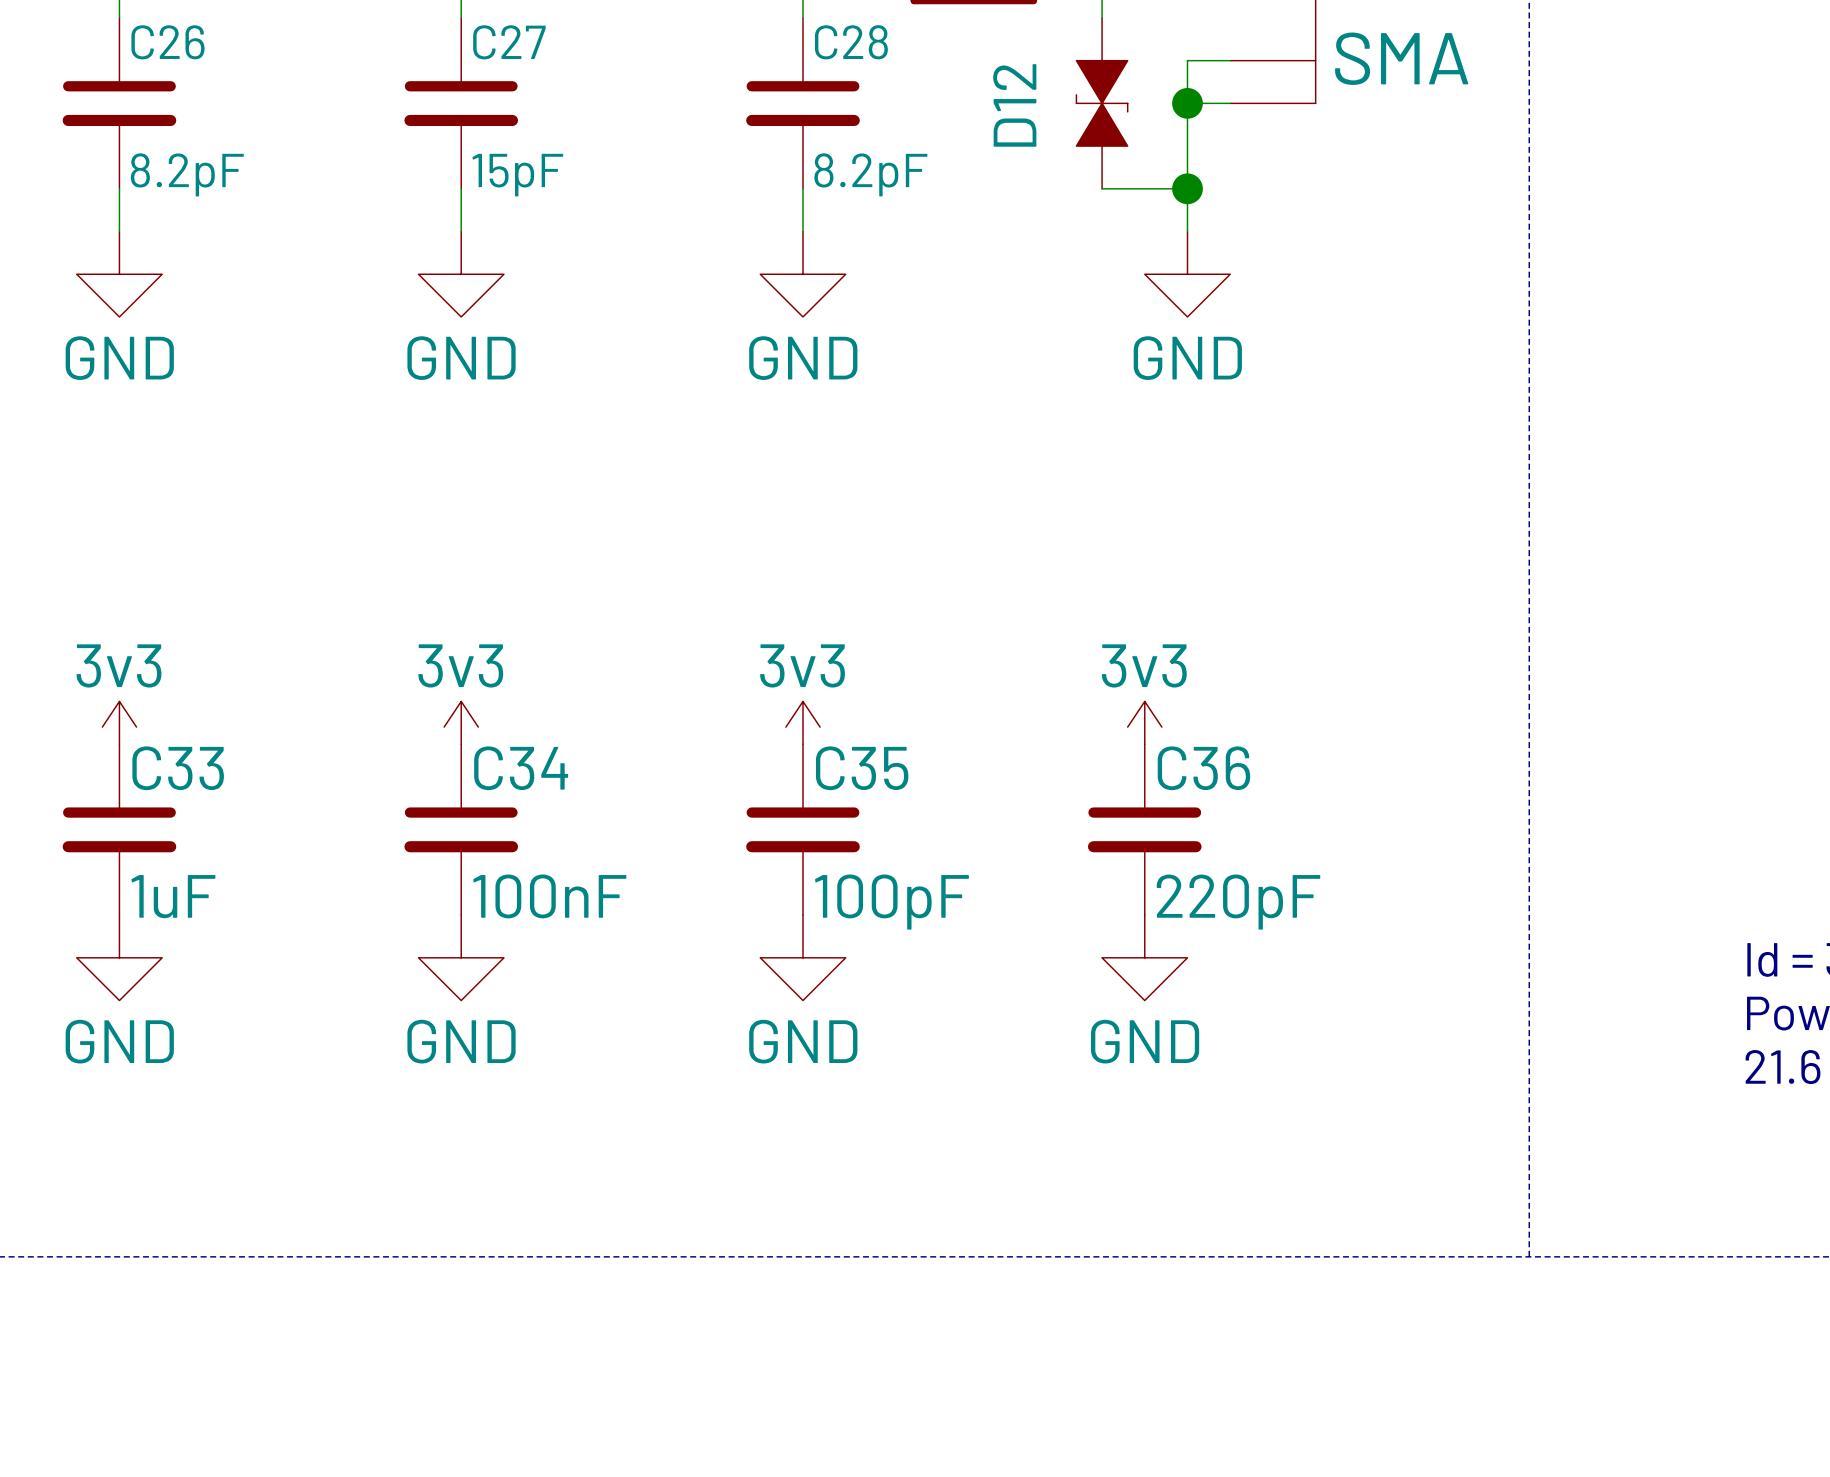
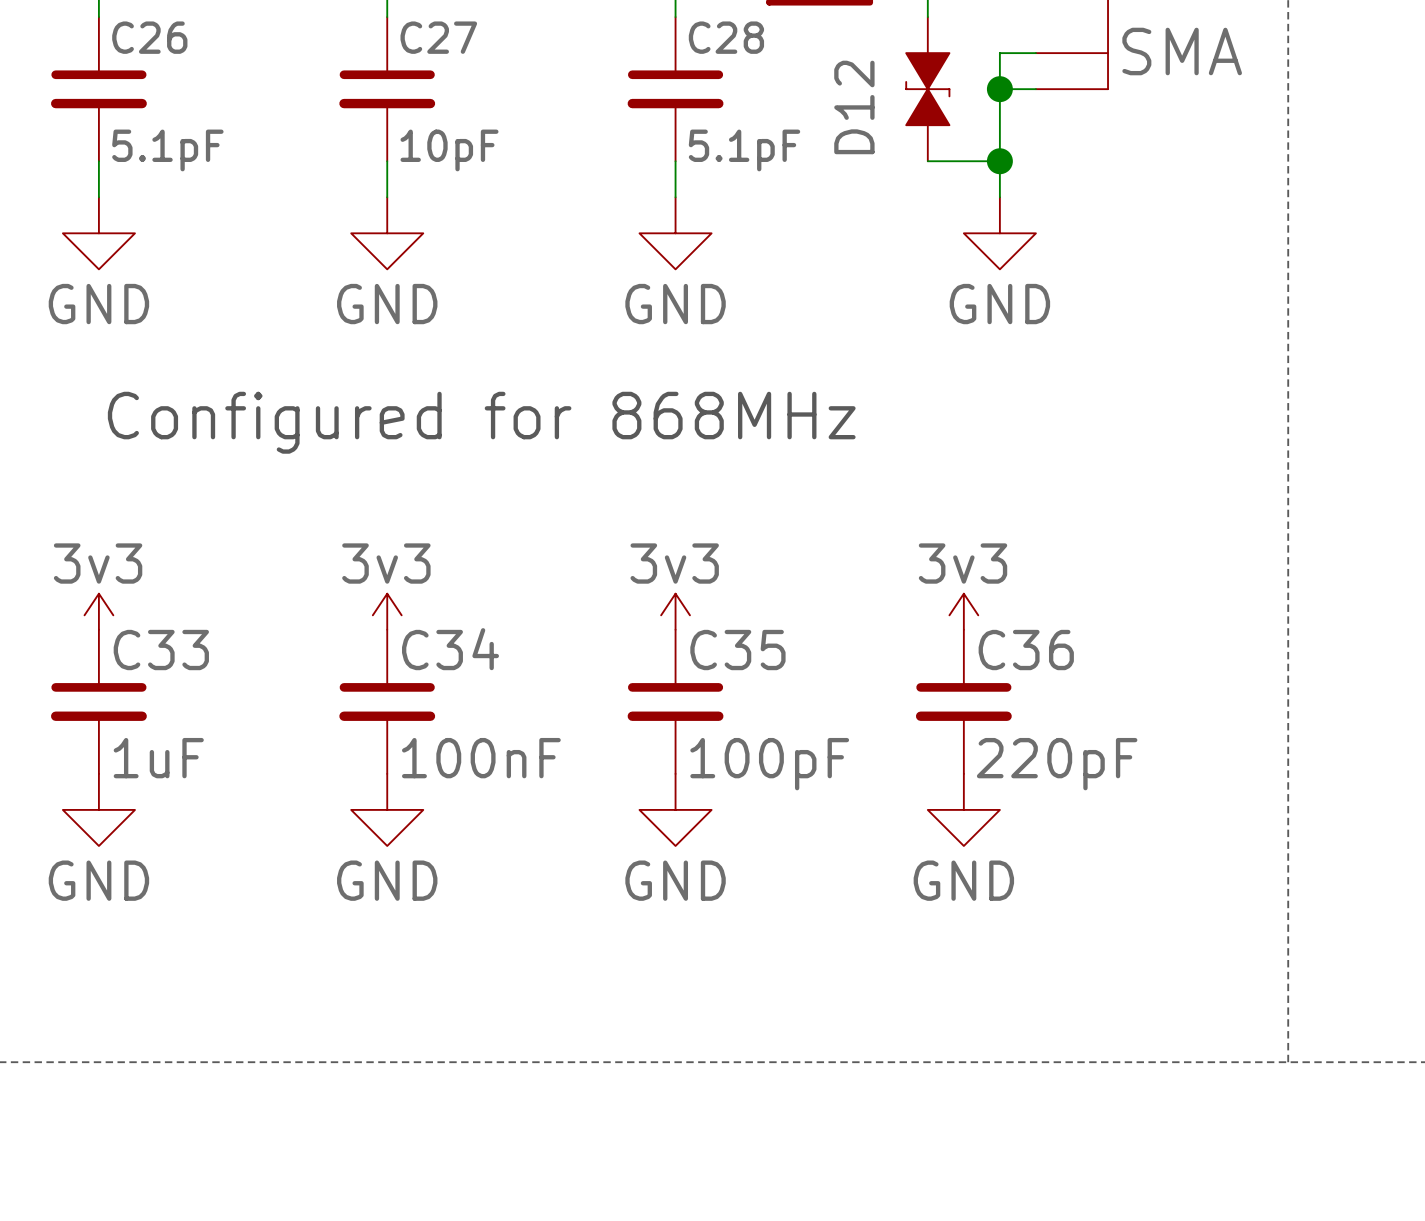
C26 value: 8.2pF (187, 174) -> 5.1pF (167, 150)
C28 value: 8.2pF (870, 174) -> 5.1pF (744, 150)
C27 value: 15pF (517, 175) -> 10pF (449, 150)
text: none -> Configured for 868MHz (481, 422)

